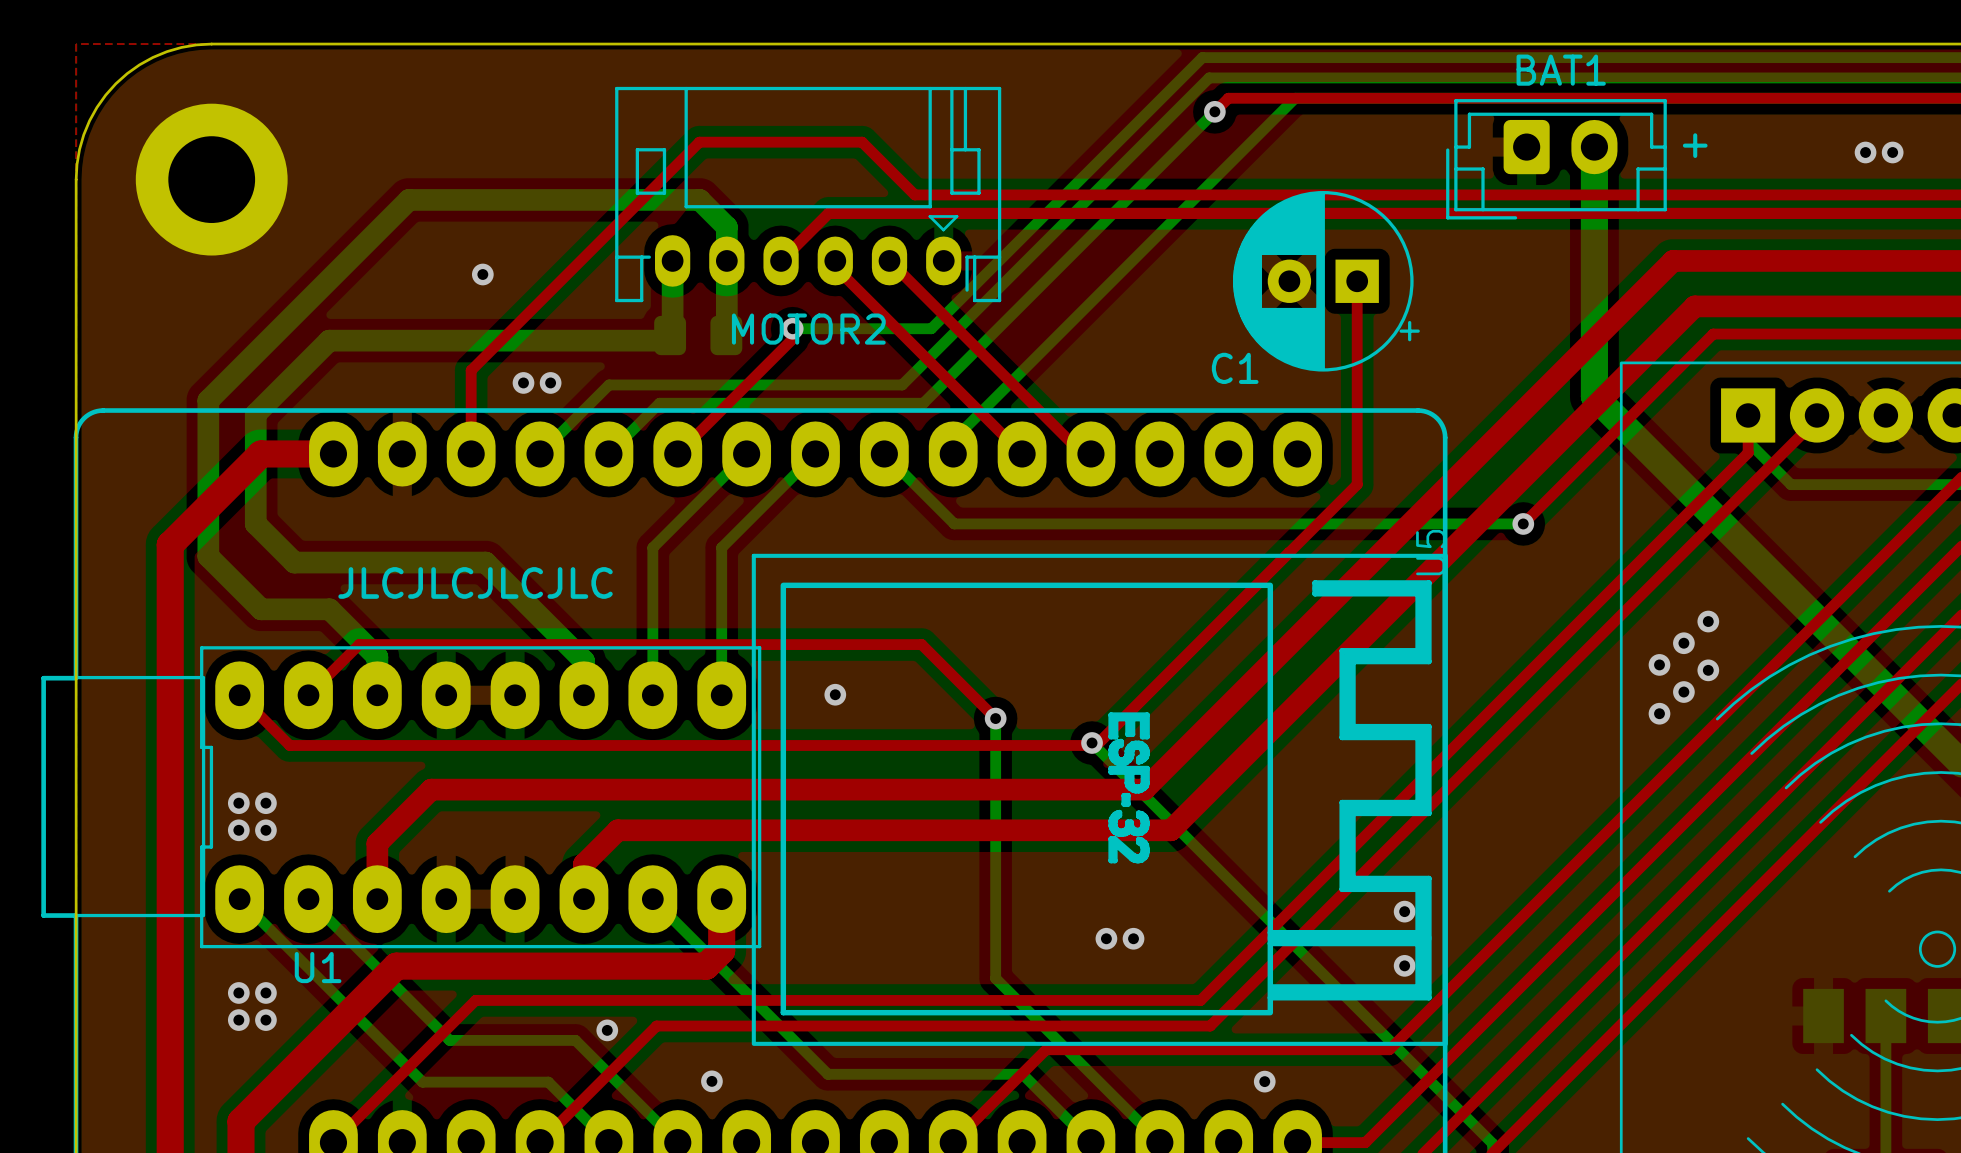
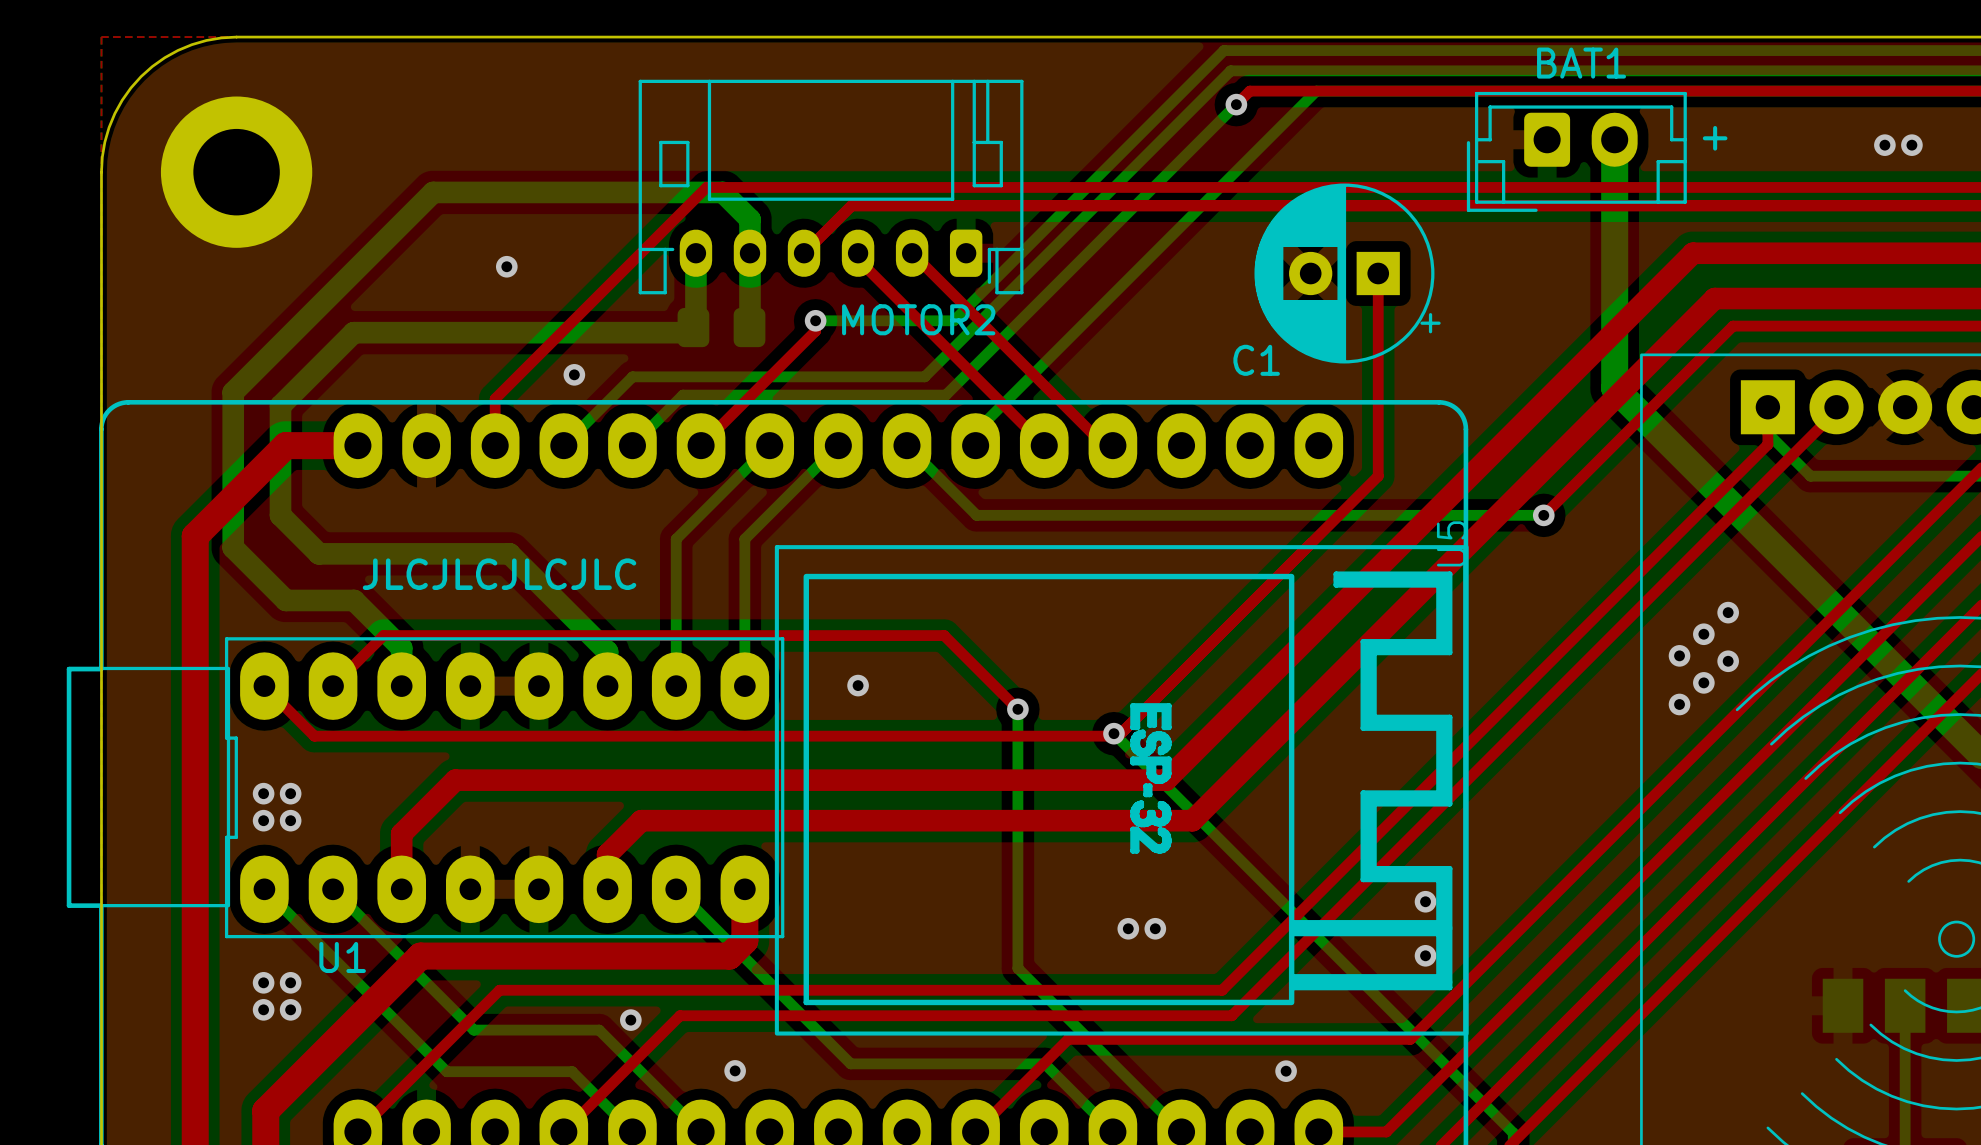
MOTOR2 footprint: [615, 86, 1002, 303] -> [638, 79, 1024, 295]
top track: (914, 194) (862, 142) (699, 142) (471, 370) (471, 407) -> (937, 187) (706, 187) (495, 398)
MOTOR2 name position: MOTOR2 (808, 329) -> MOTOR2 (918, 319)
via: (523, 382) -> none

